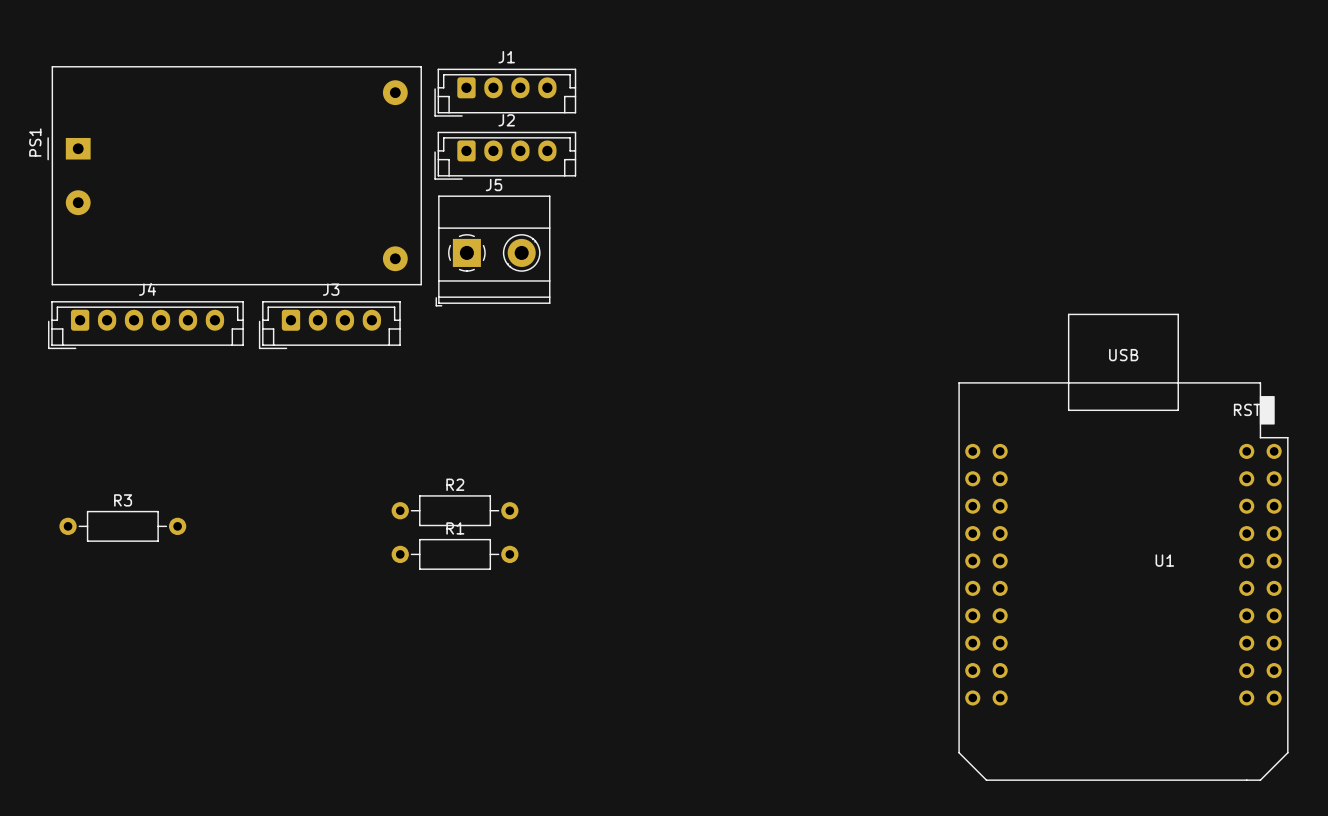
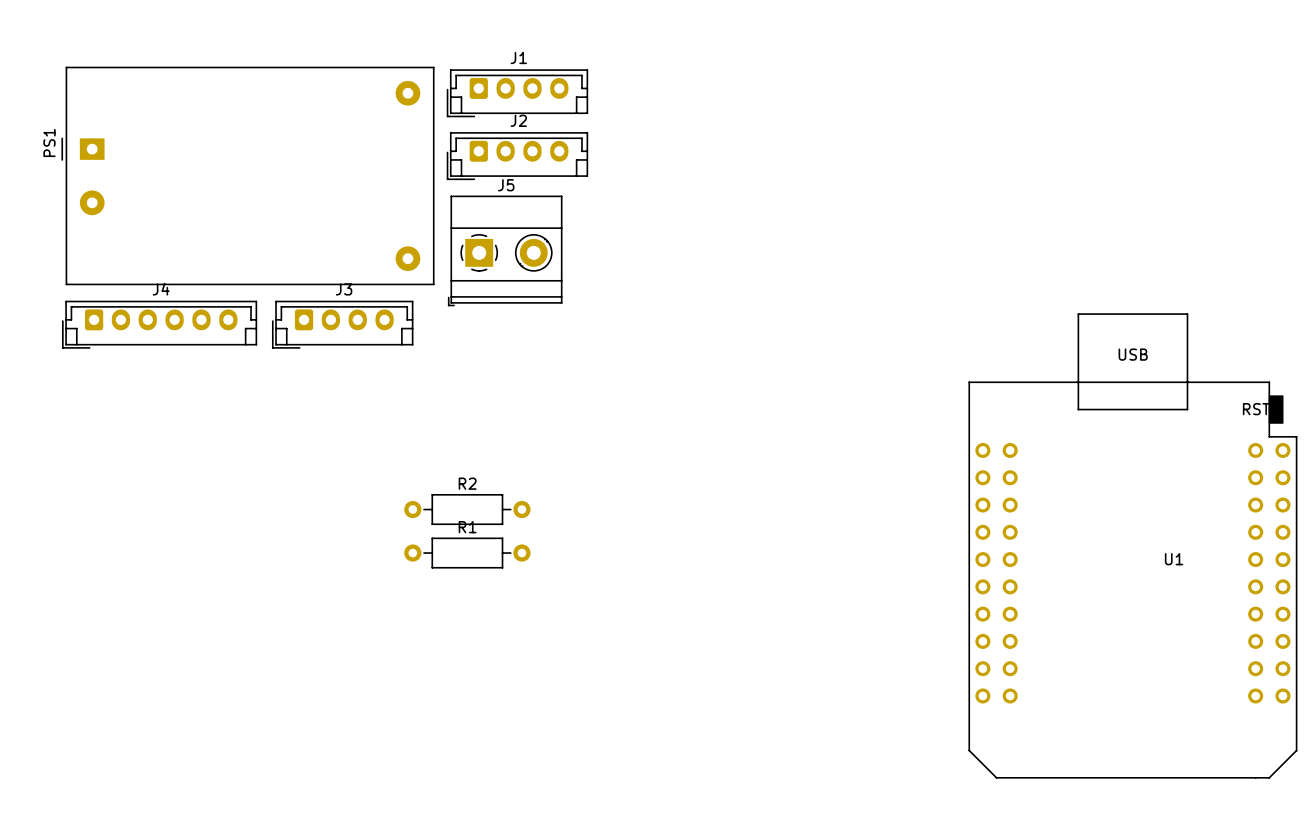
R3: (122, 526) -> none

